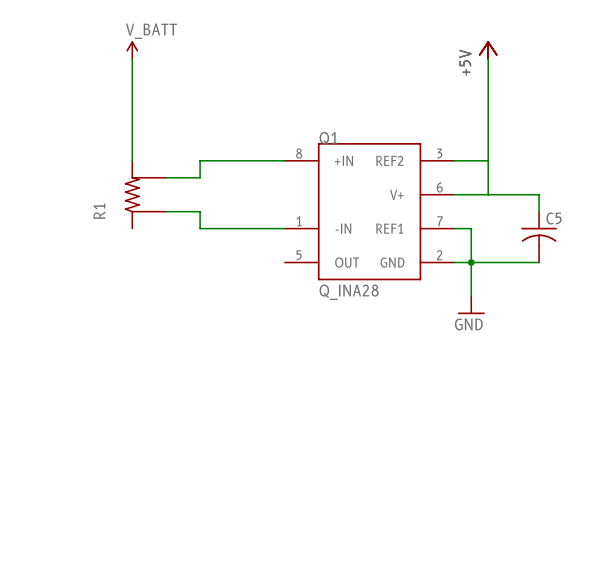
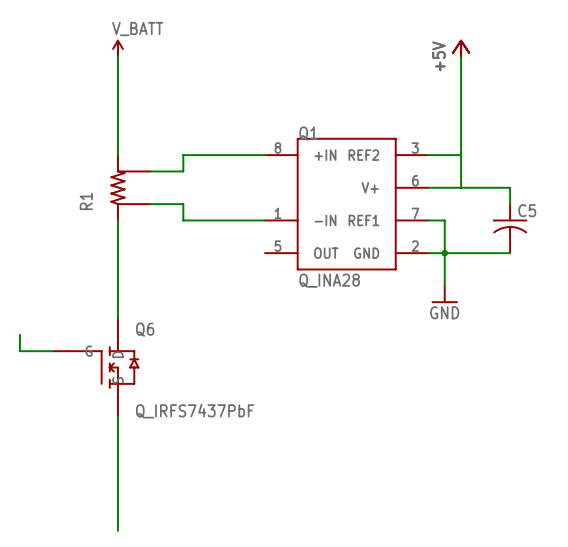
wire: none -> (117, 220) (117, 318)
wire: none -> (19, 334) (19, 351) (52, 351)
Q6: none -> Q_IRFS7437PbF (95, 367)
wire: none -> (117, 416) (117, 530)

